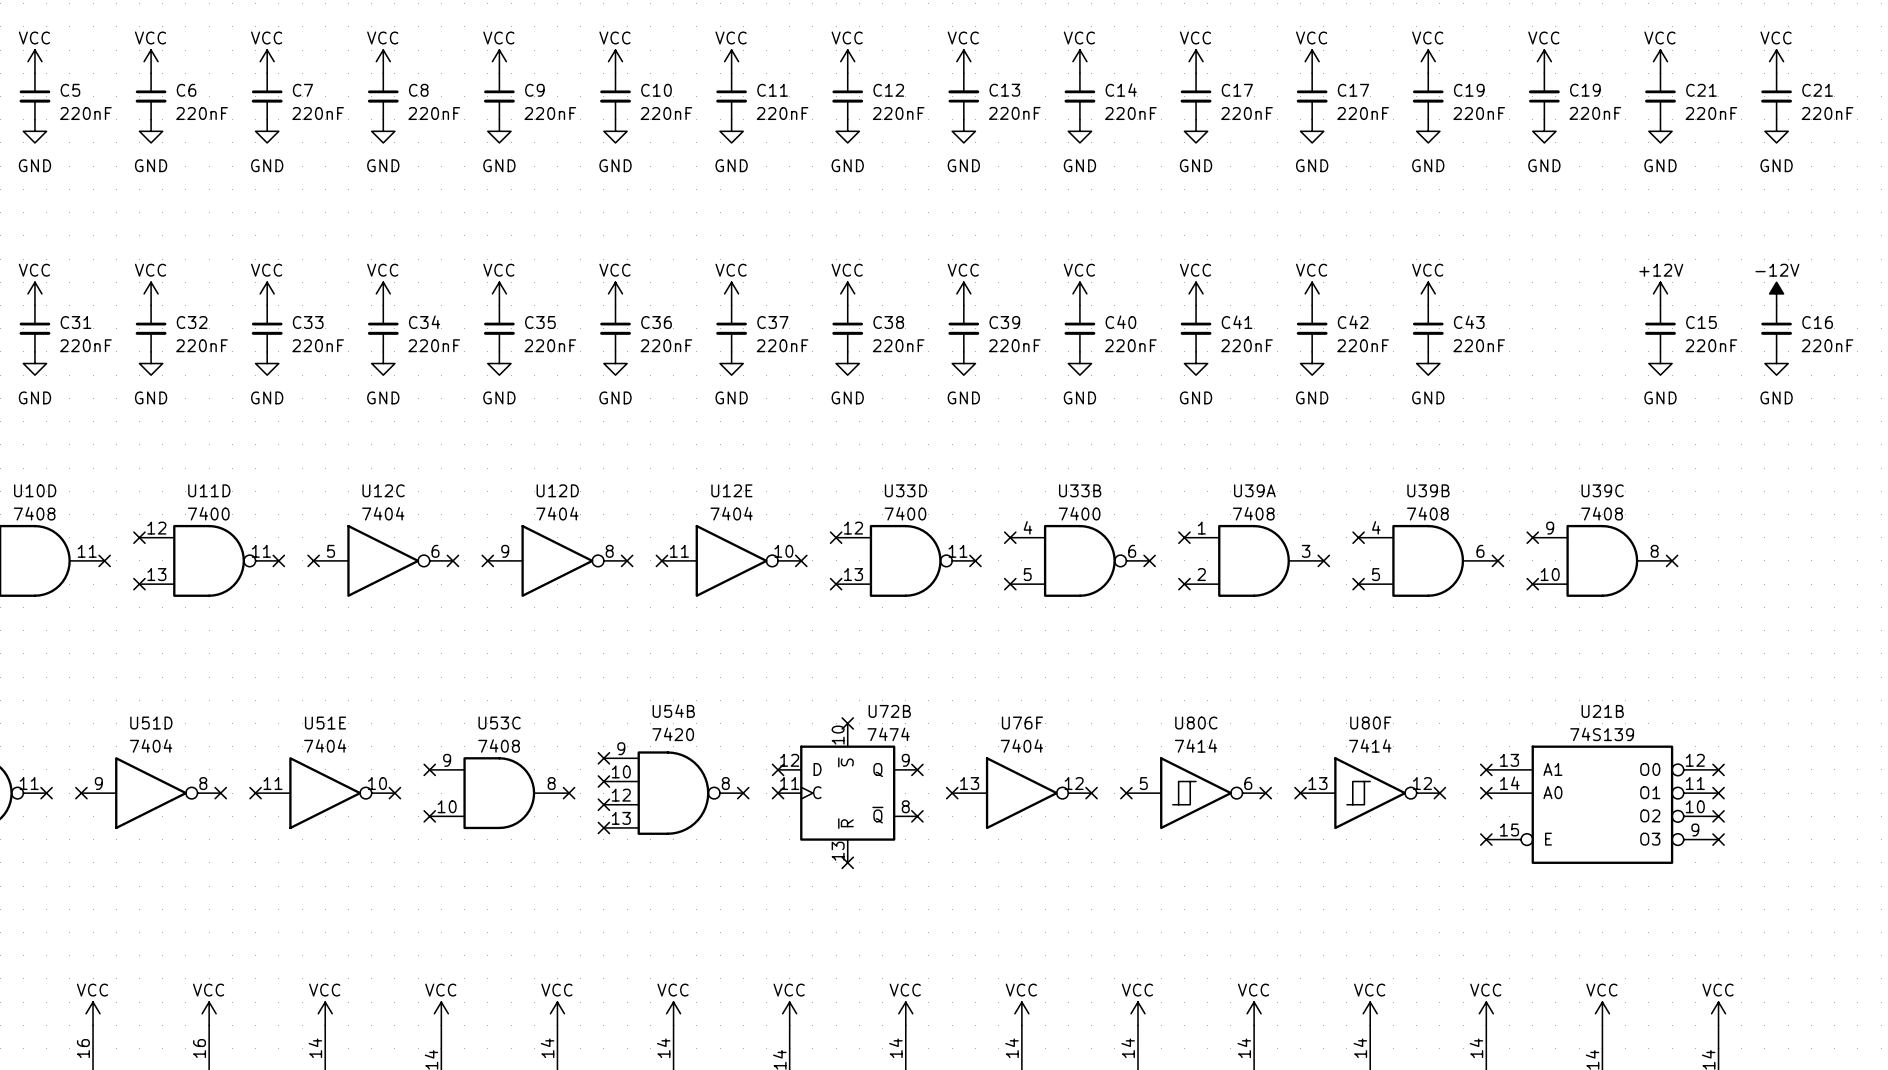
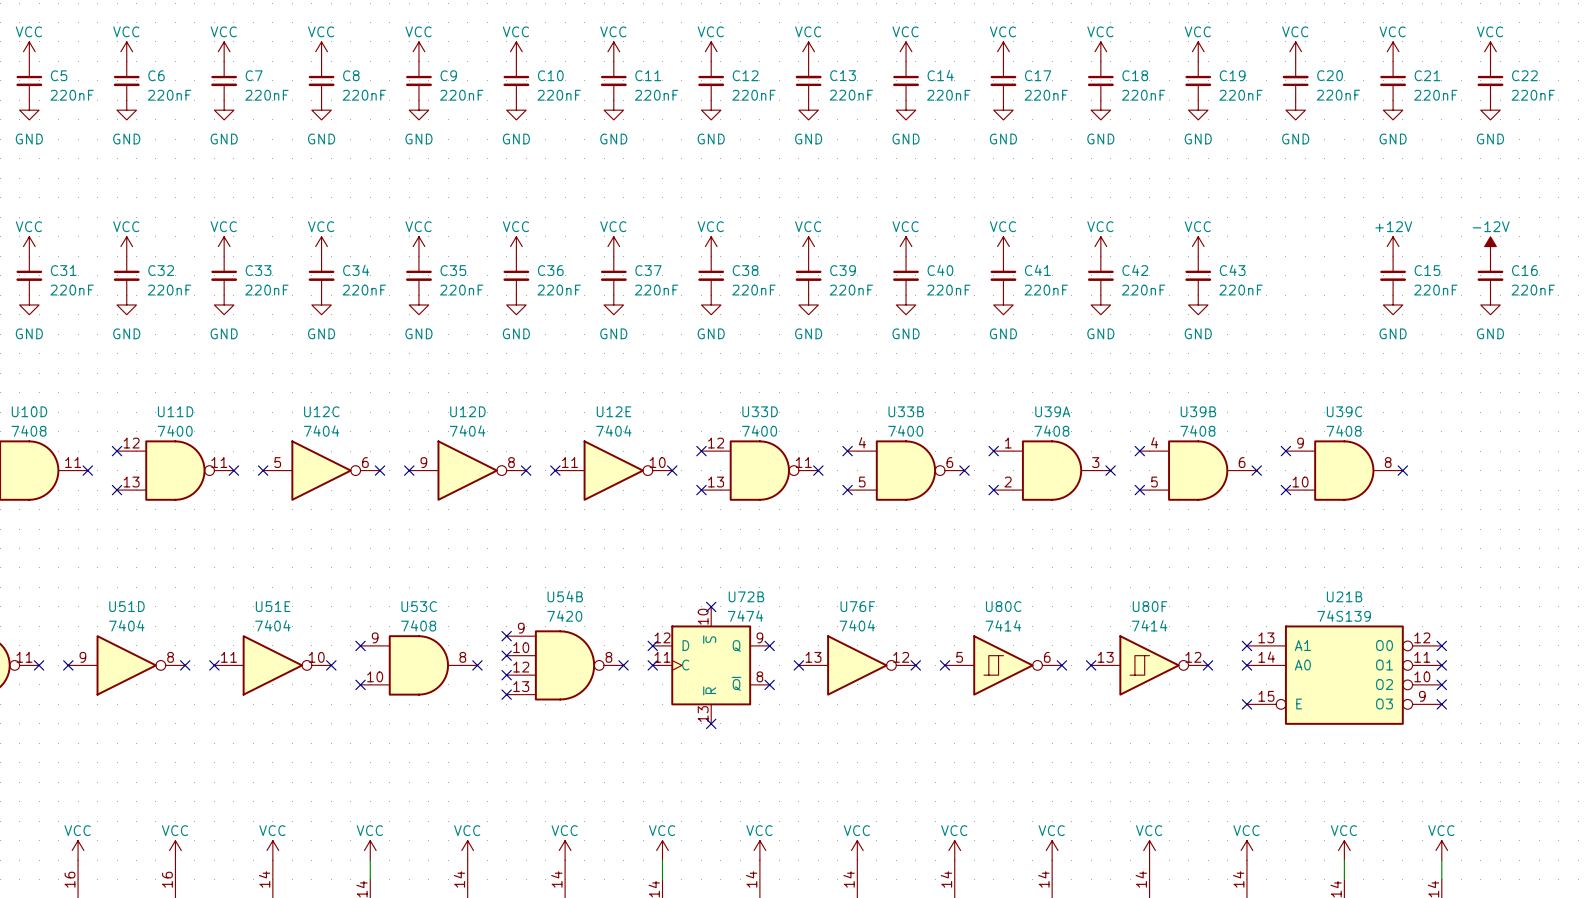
C17 name: C17 (1353, 90) -> C18 (1135, 75)
C19 name: C19 (1585, 90) -> C20 (1330, 75)
C21 name: C21 (1817, 90) -> C22 (1524, 75)

